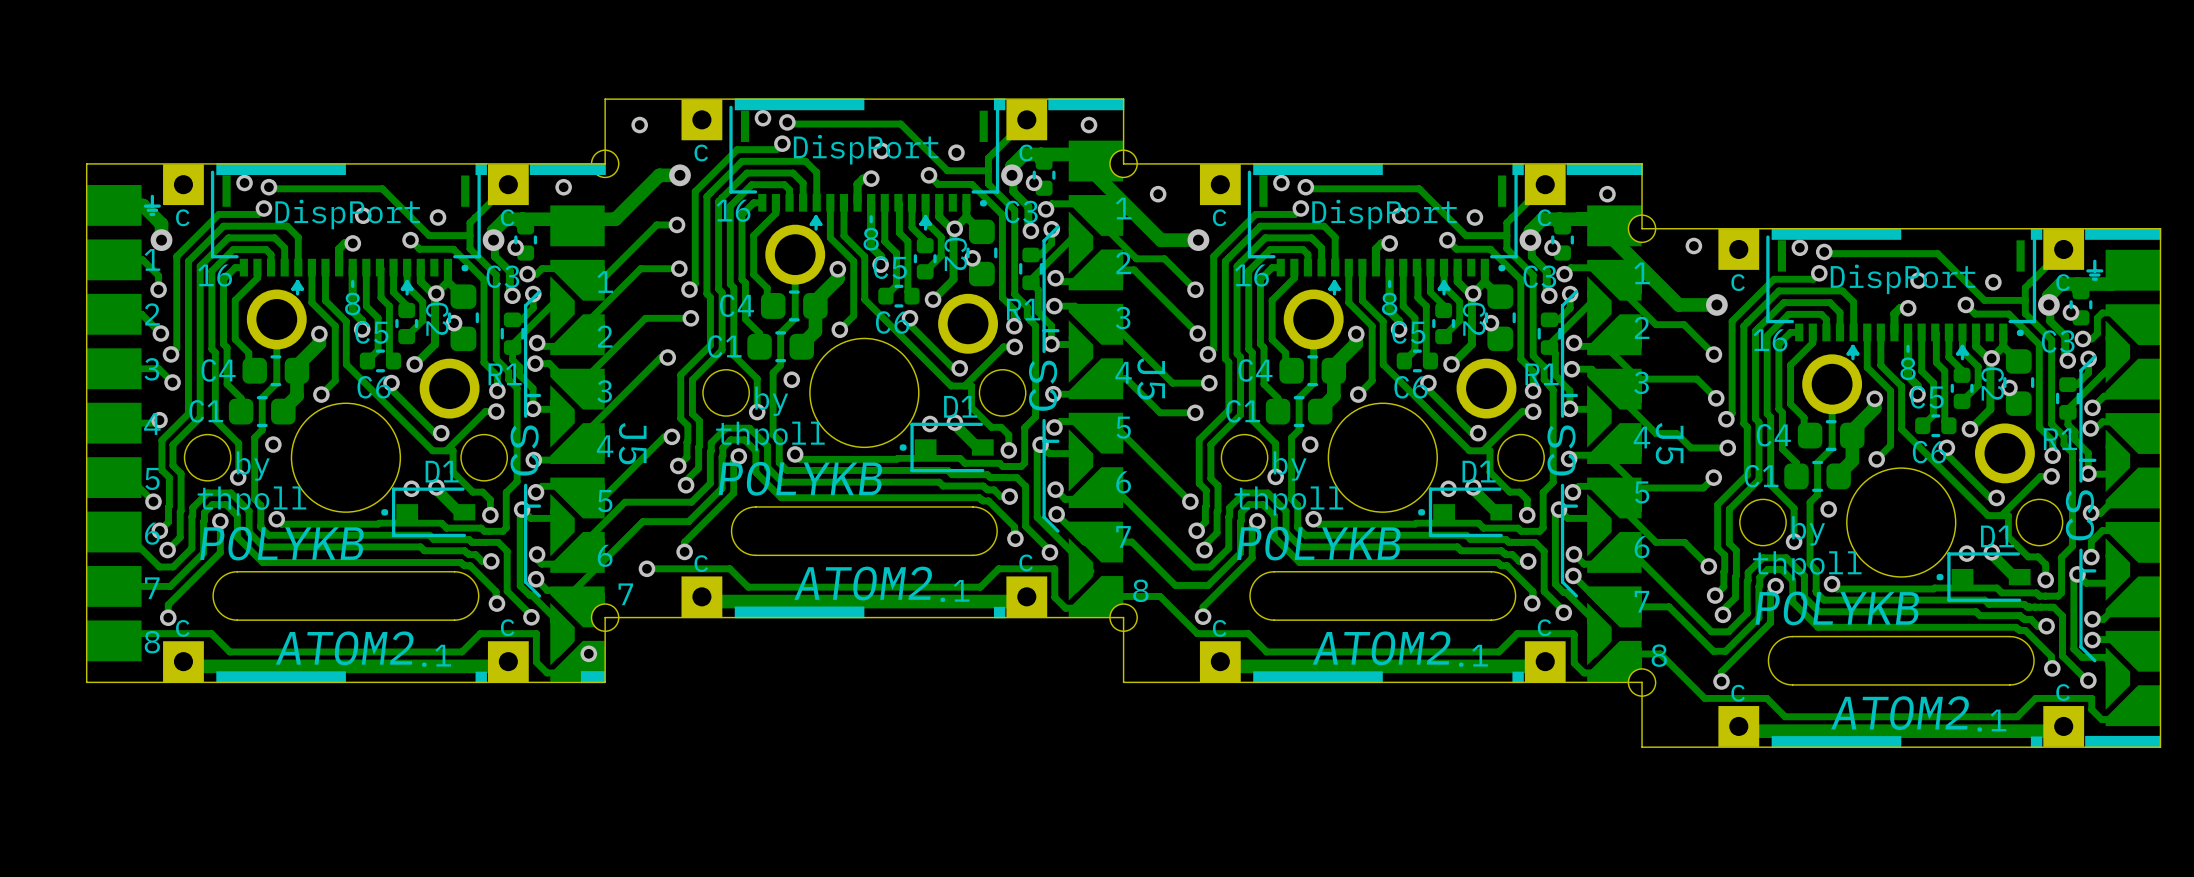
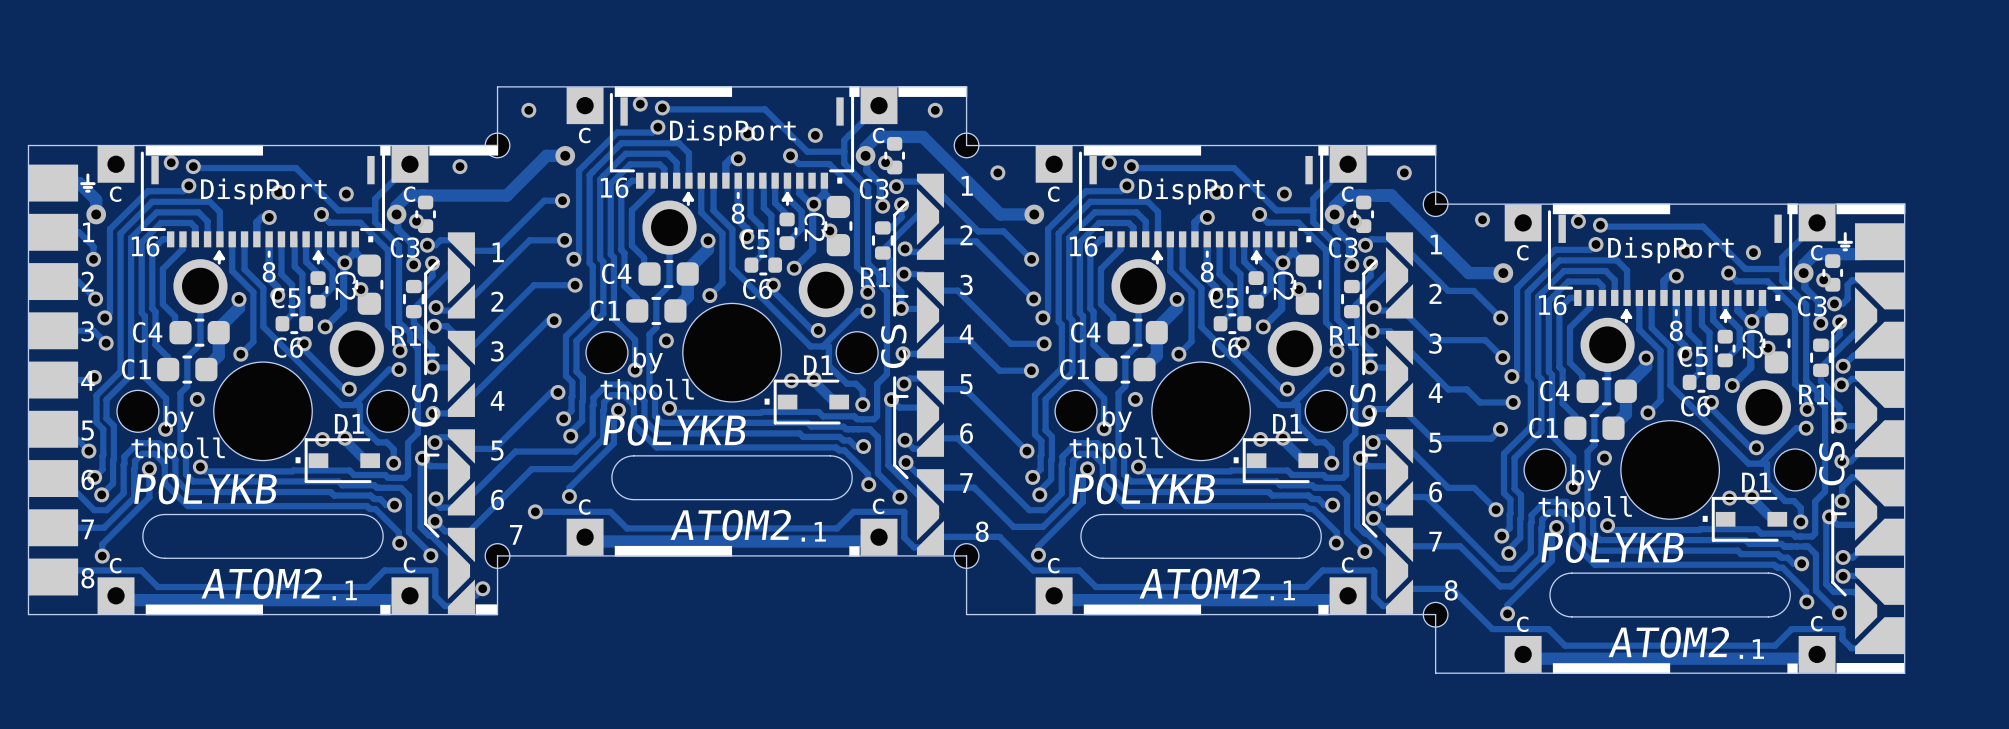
J5: (1095, 378) -> none
part: none -> (930, 364)
J5: (577, 443) -> none
J5: (1614, 443) -> none
part: none -> (461, 423)
part: none -> (1399, 423)

